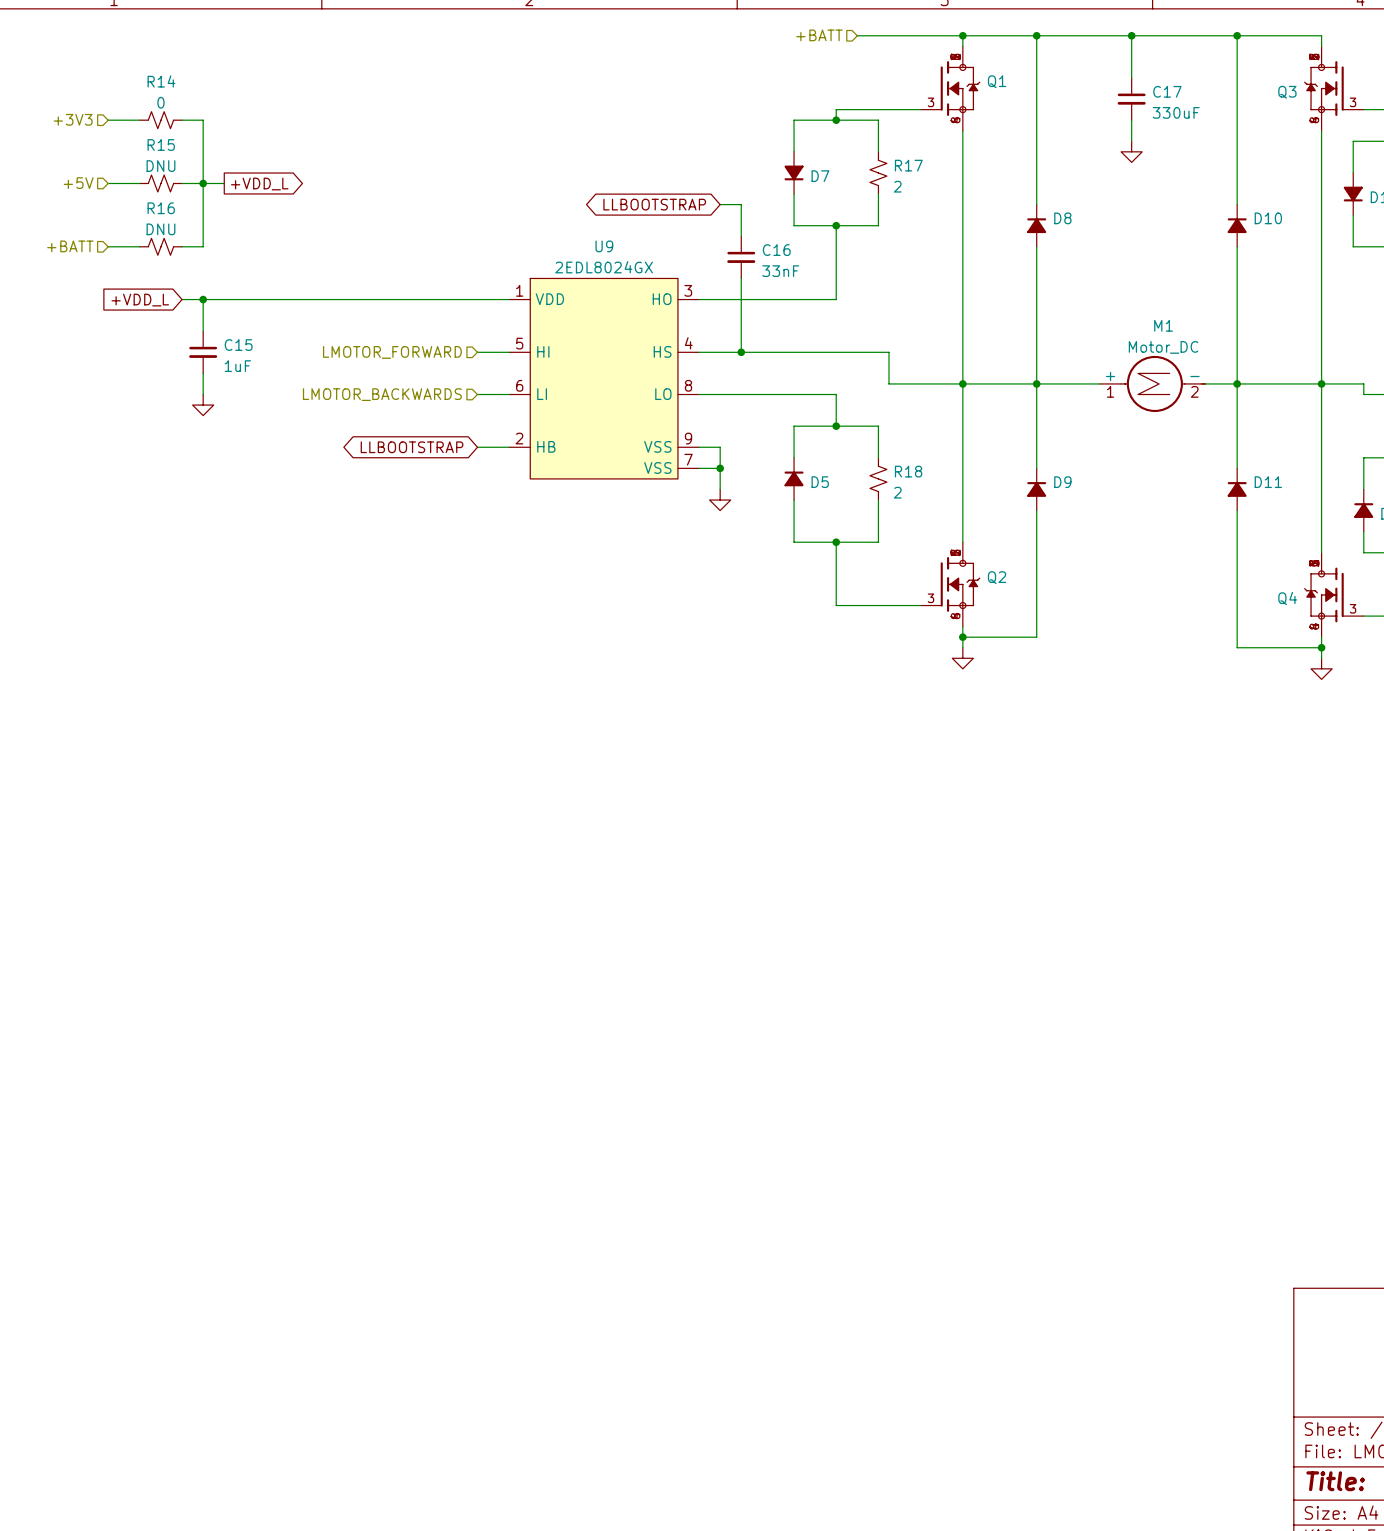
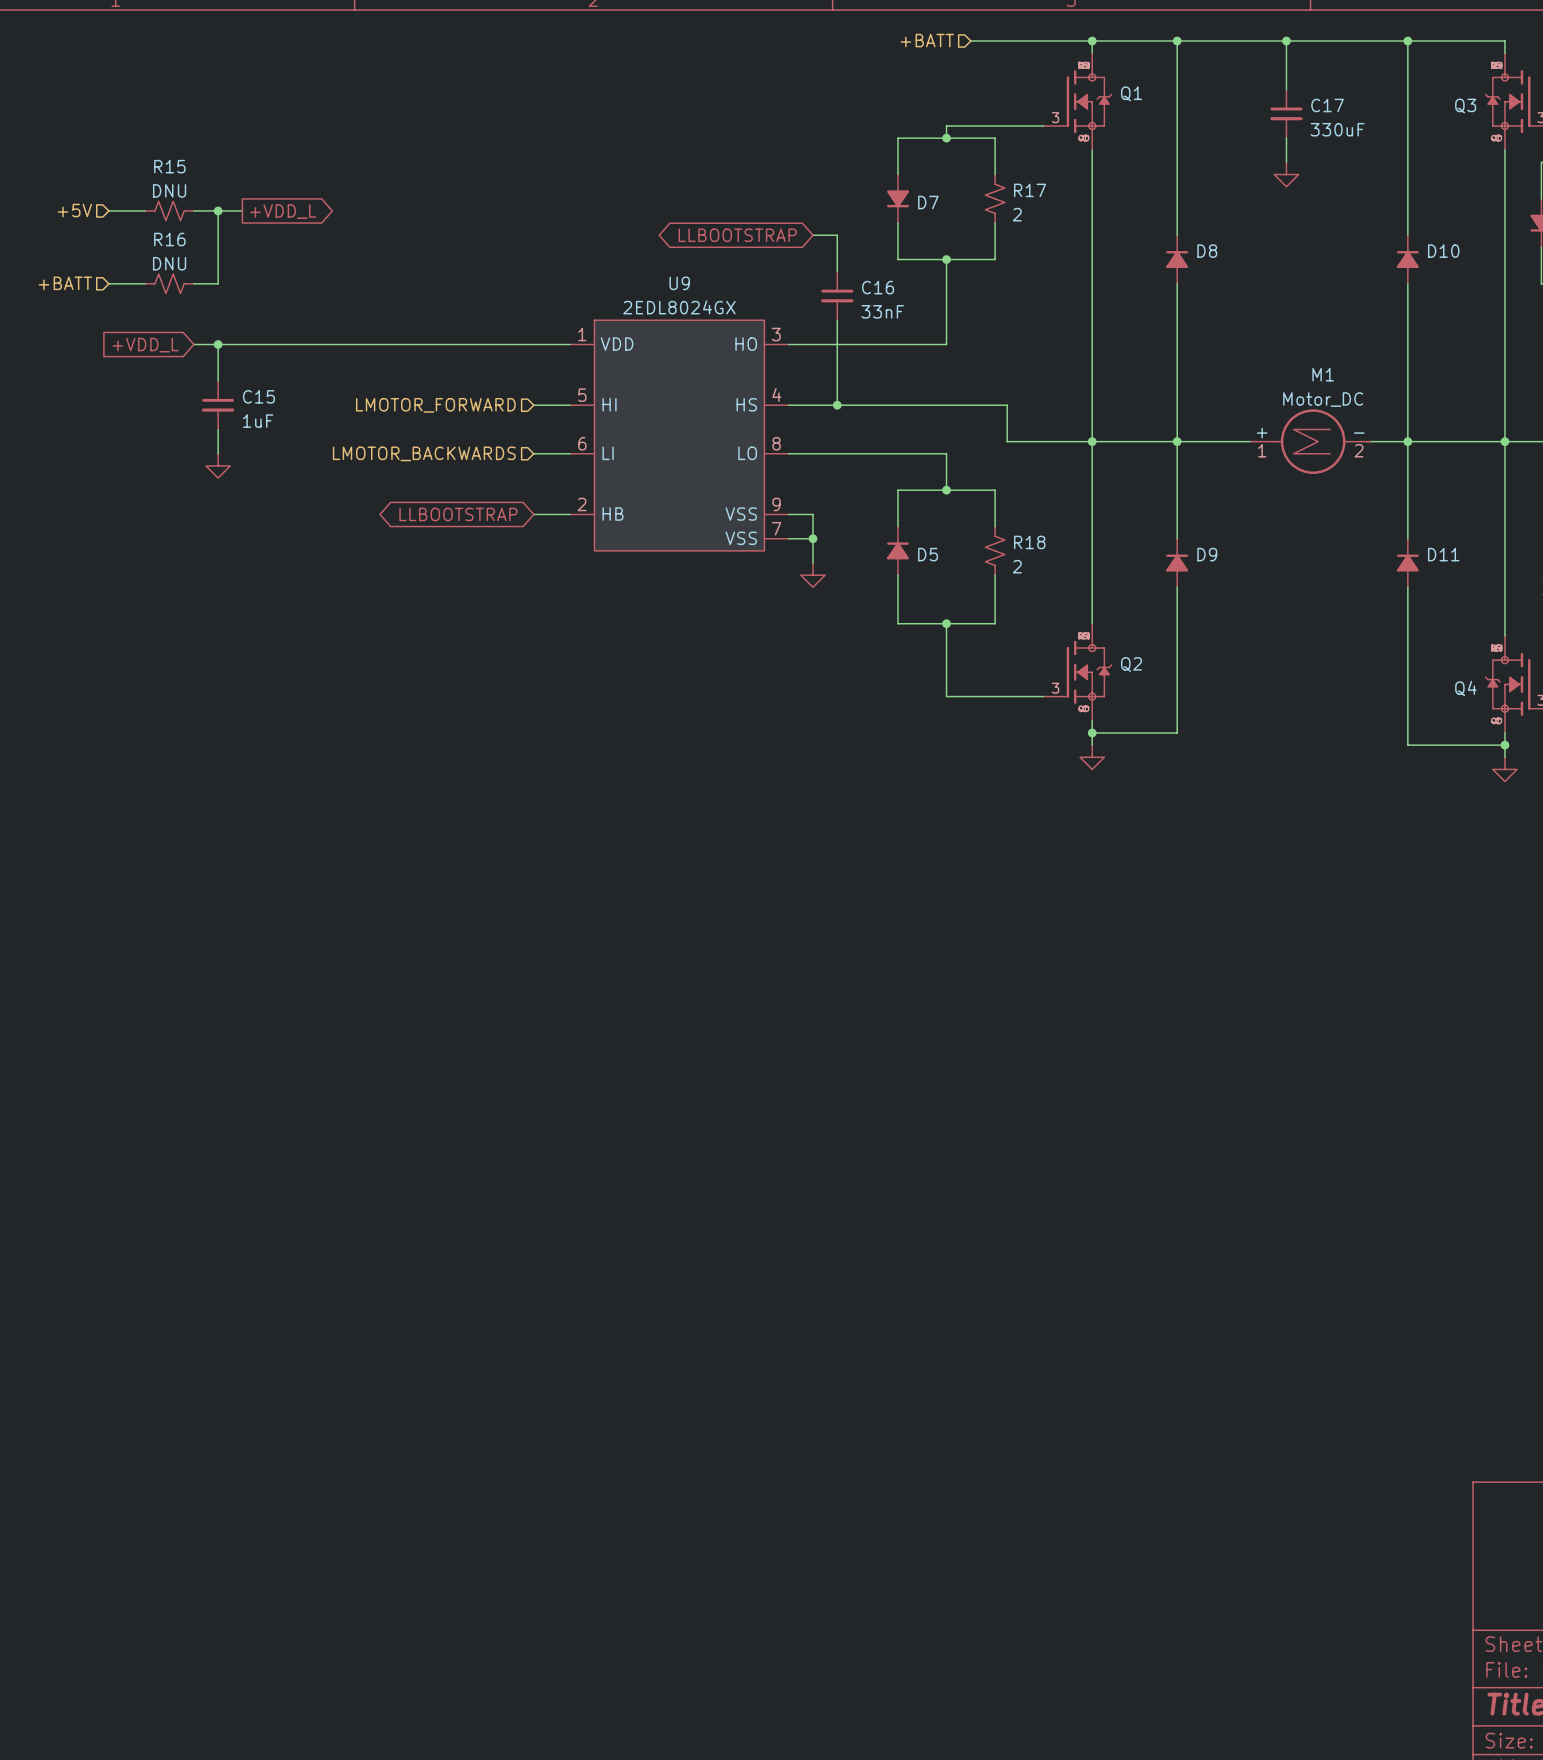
hierarchical label: +3V3 (73, 119) -> none
wire: (108, 120) (139, 120) -> none
R14: 0 (160, 120) -> none
wire: (182, 120) (203, 120) (203, 183) -> none

